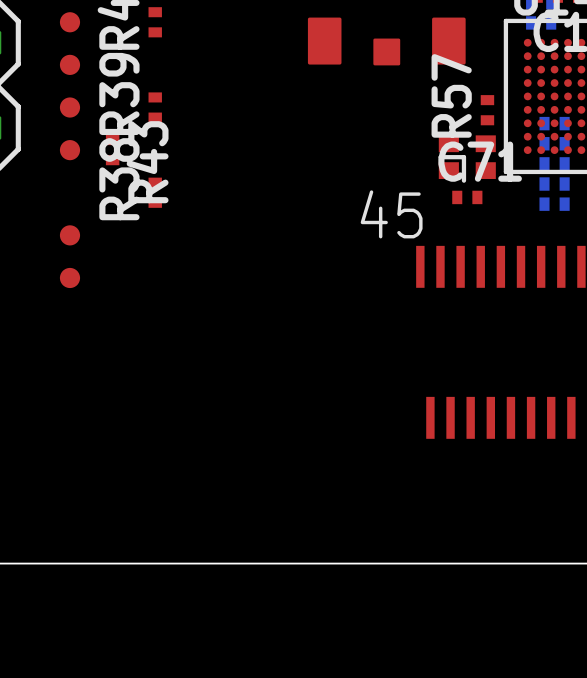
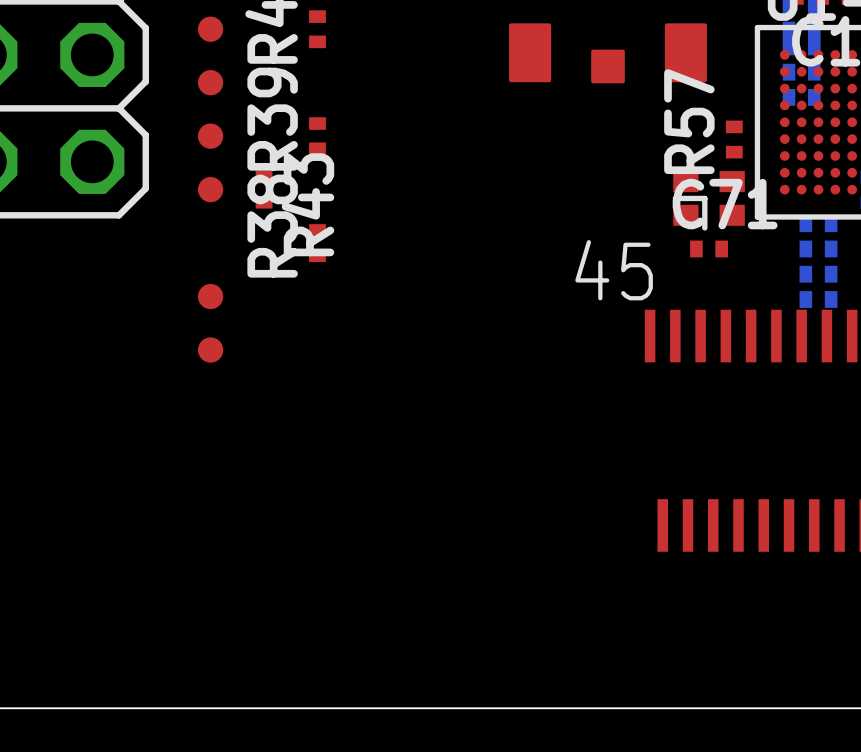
part: none -> (801, 46)
part: none -> (801, 72)
part: none -> (801, 97)
part: (554, 123) -> none
part: (554, 143) -> none
part: (554, 163) -> none
part: none -> (818, 223)
part: (554, 184) -> none
part: none -> (818, 248)
part: (554, 204) -> none
part: none -> (818, 274)
part: none -> (818, 299)

